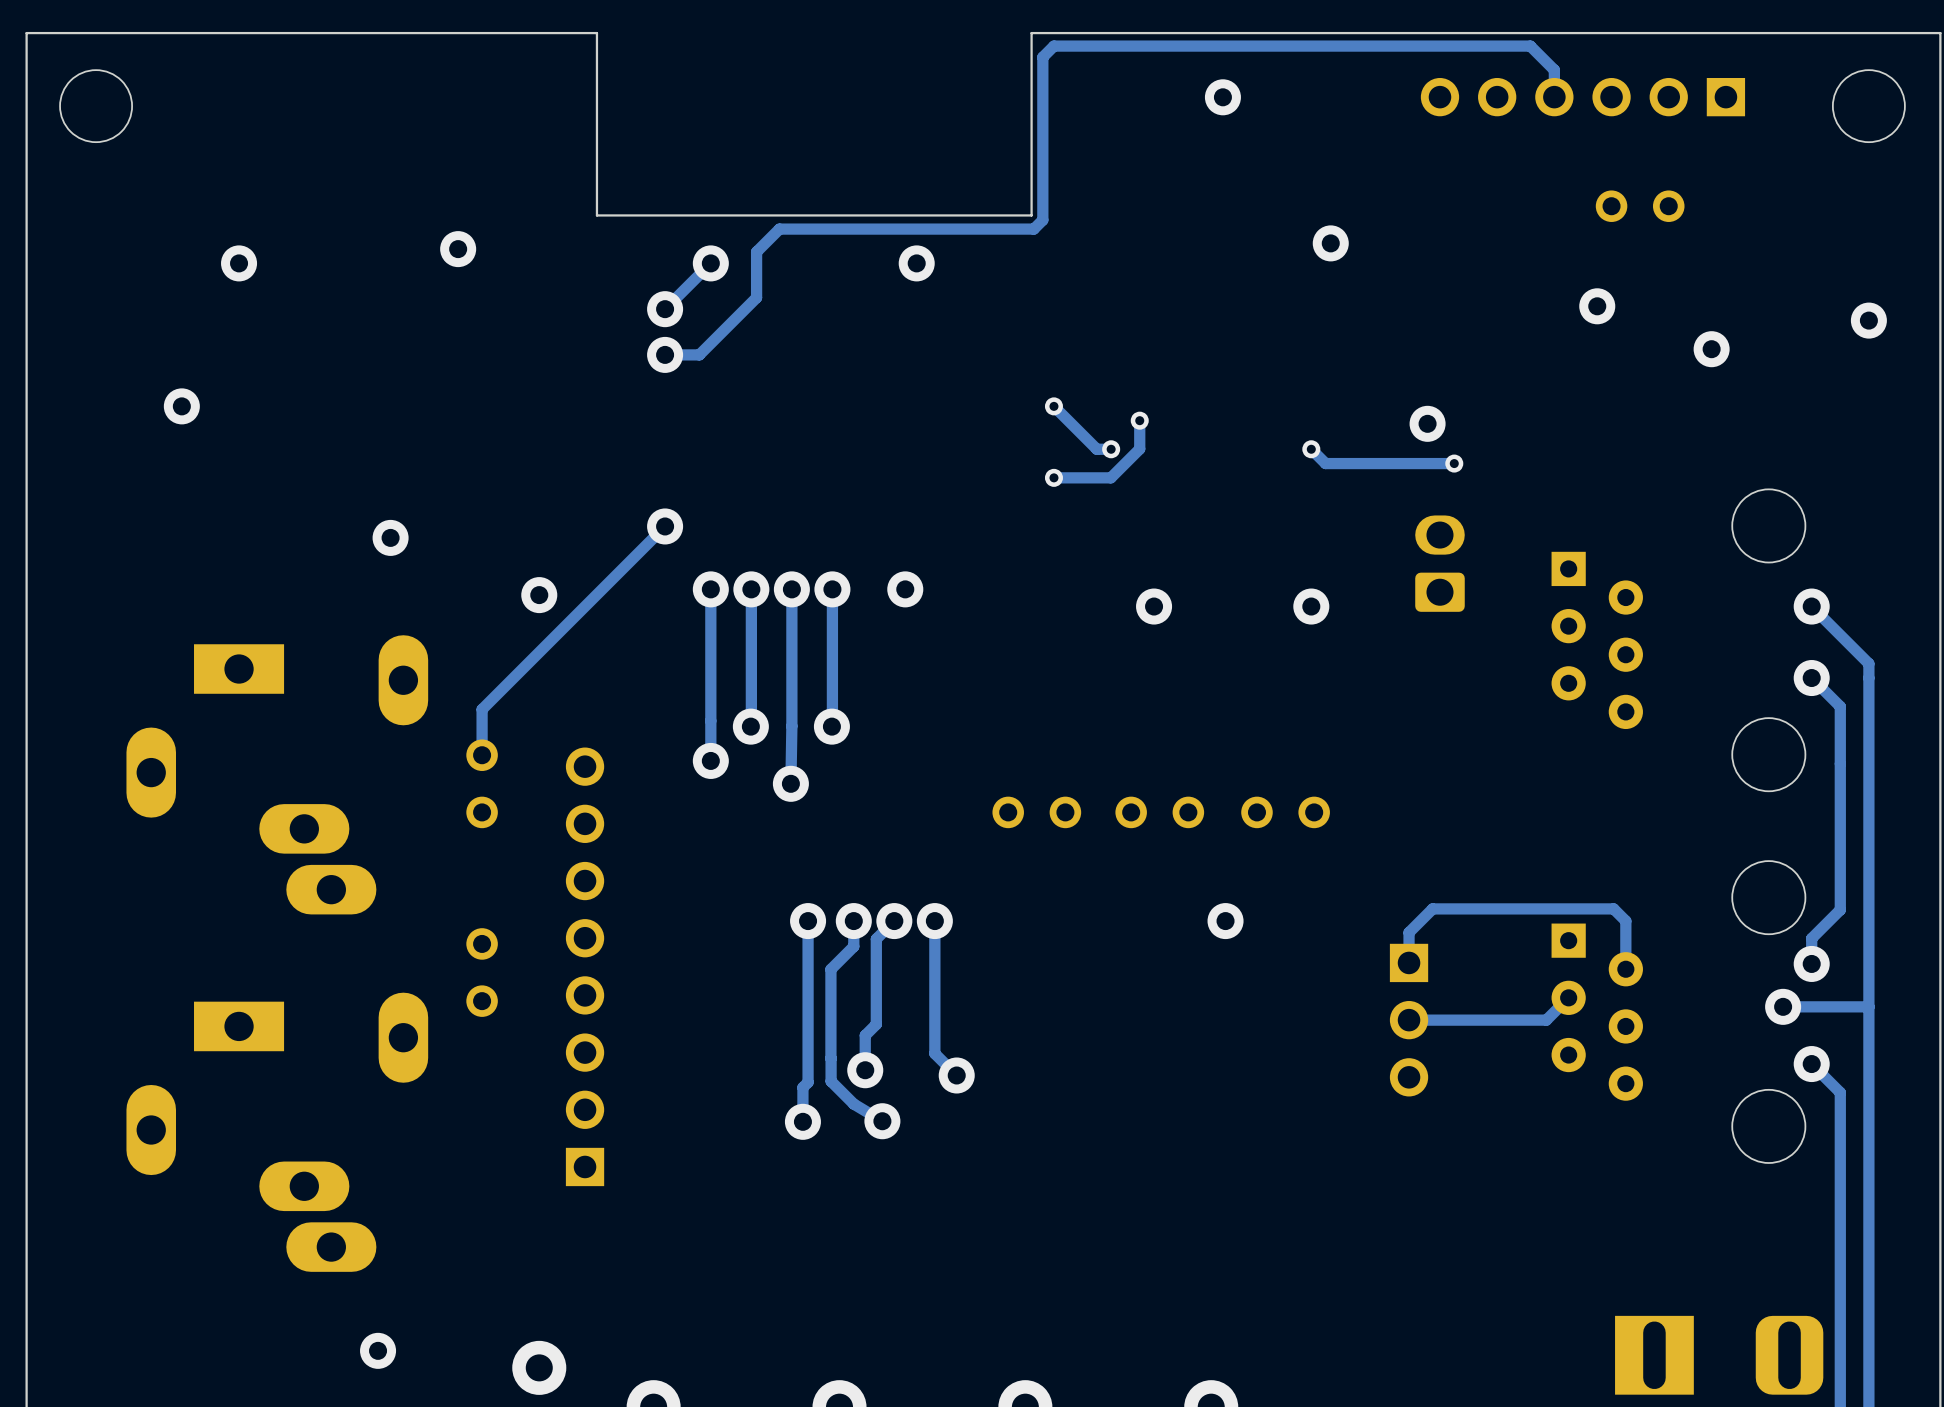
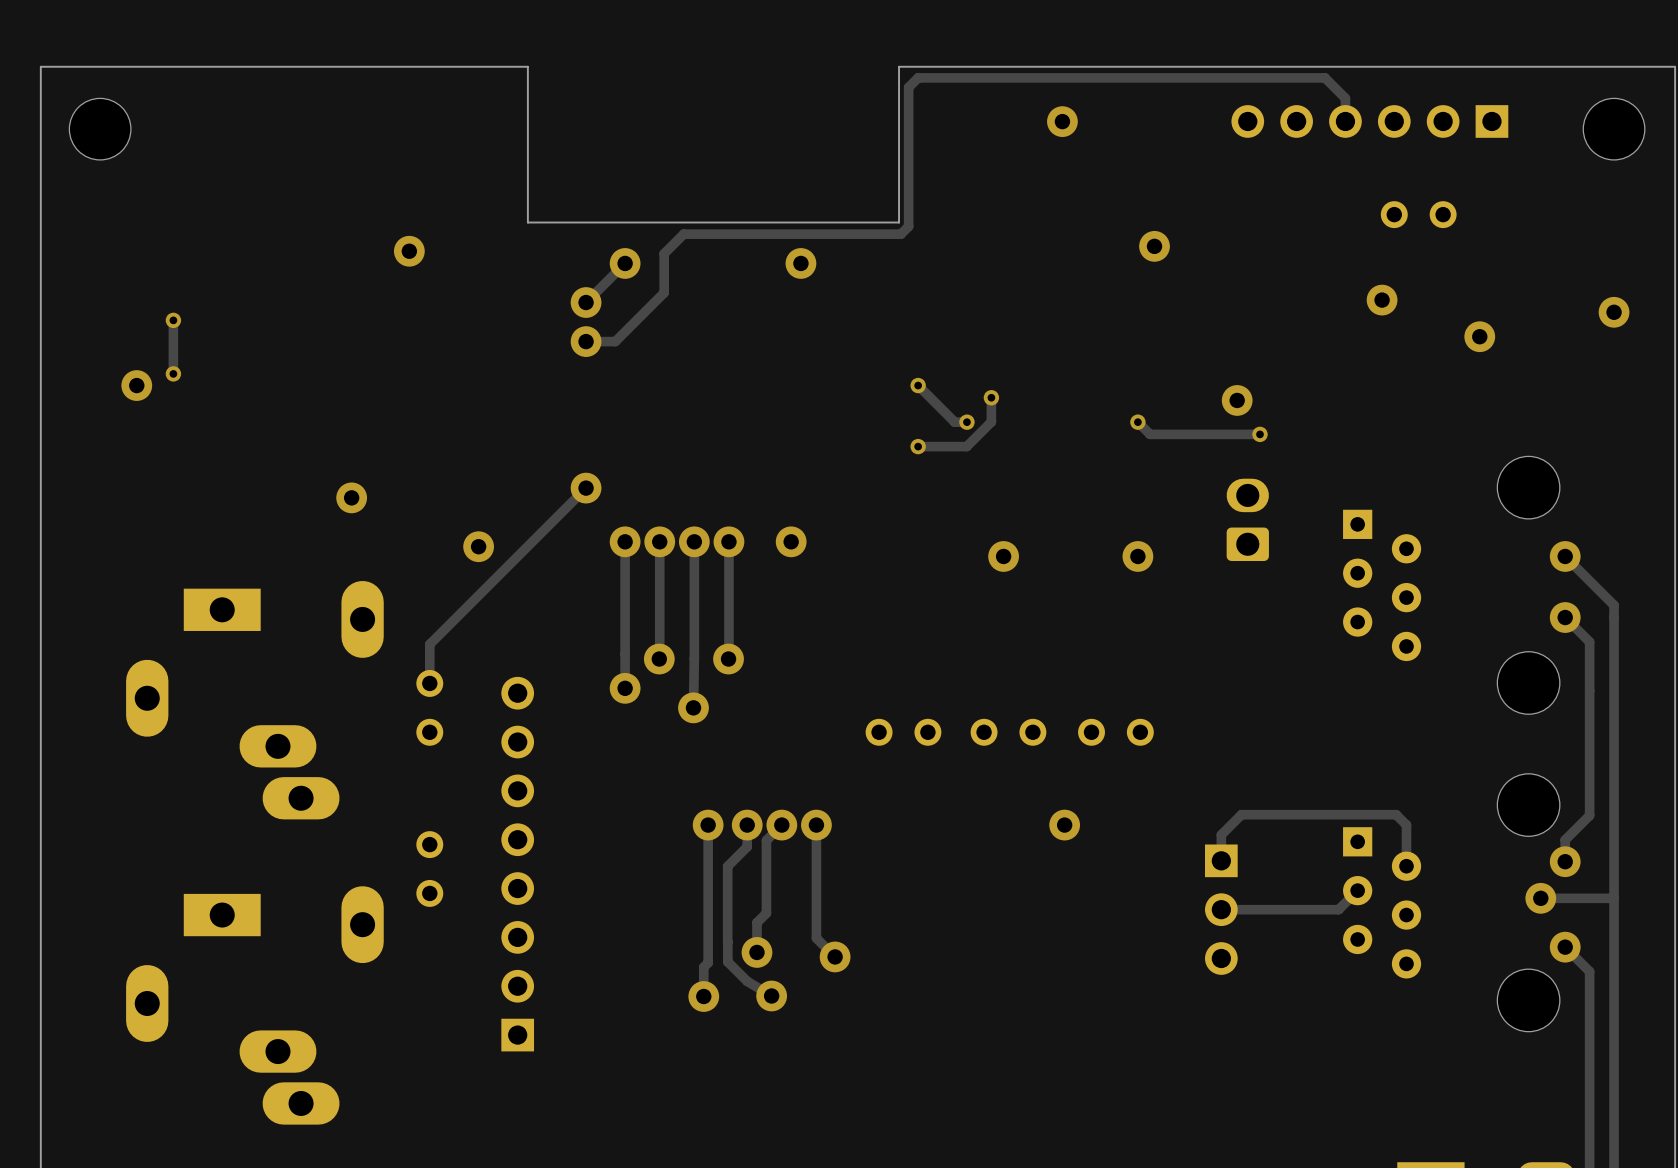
via: (239, 263) -> none
track: none -> (173, 320) (173, 373)
via: none -> (173, 320)
via: none -> (173, 373)
via position: (181, 406) -> (136, 385)

